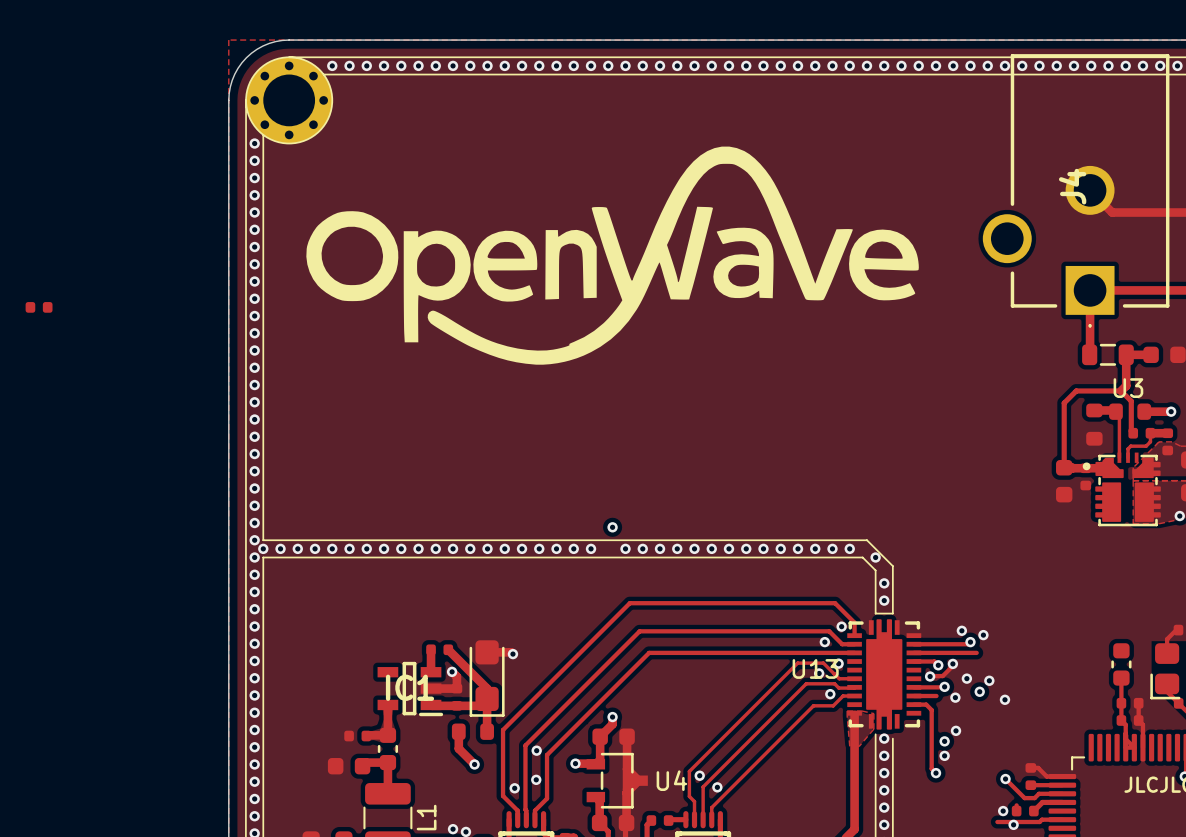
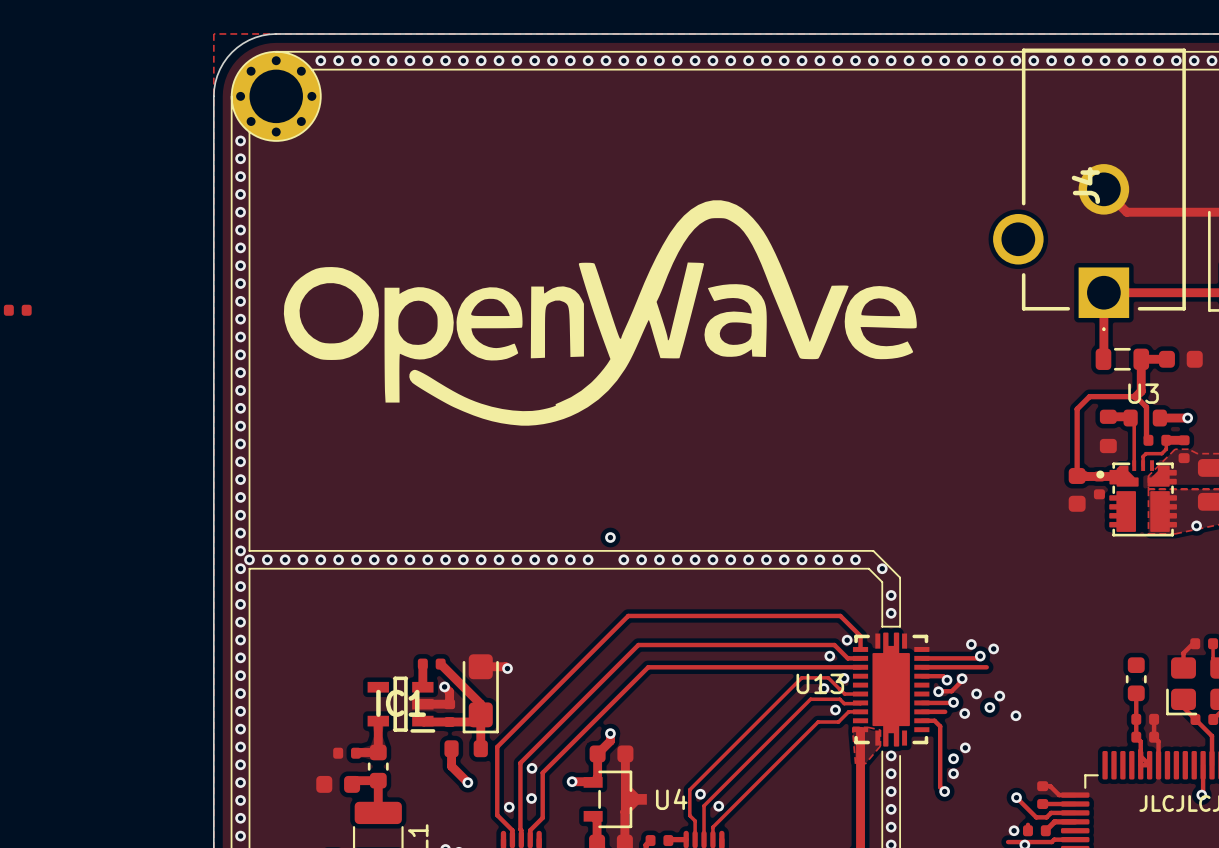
drawing position: (612, 255) -> (600, 312)

